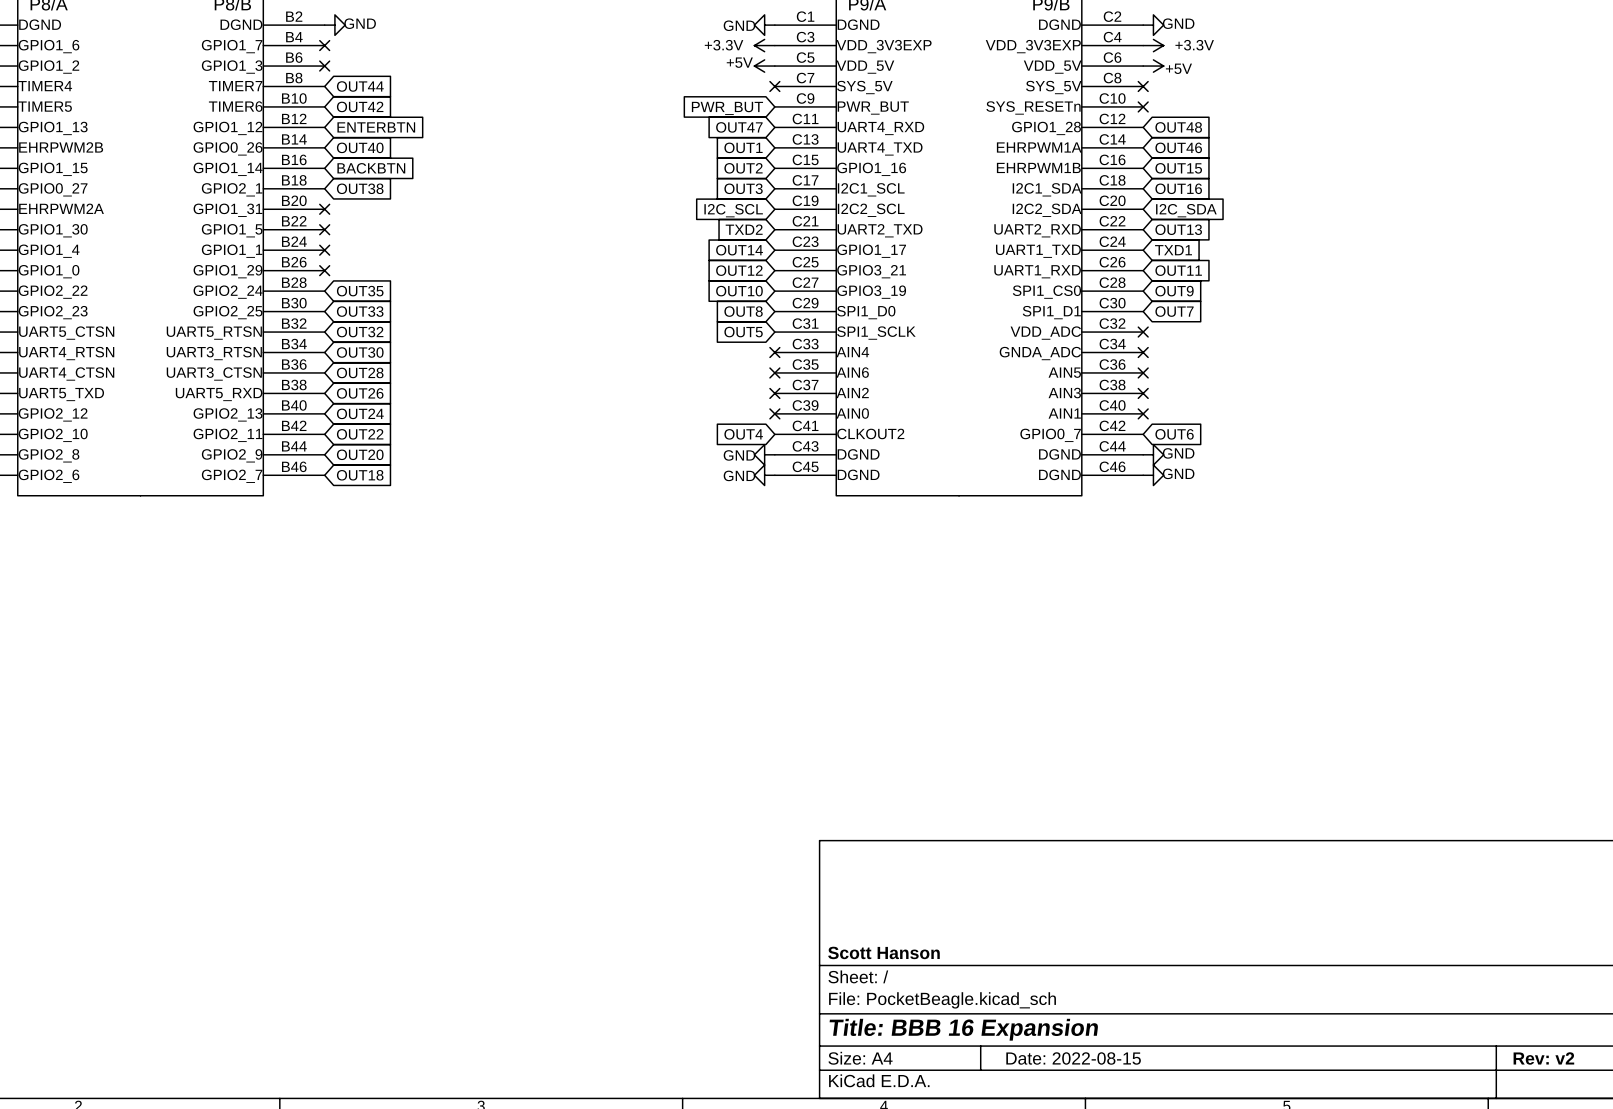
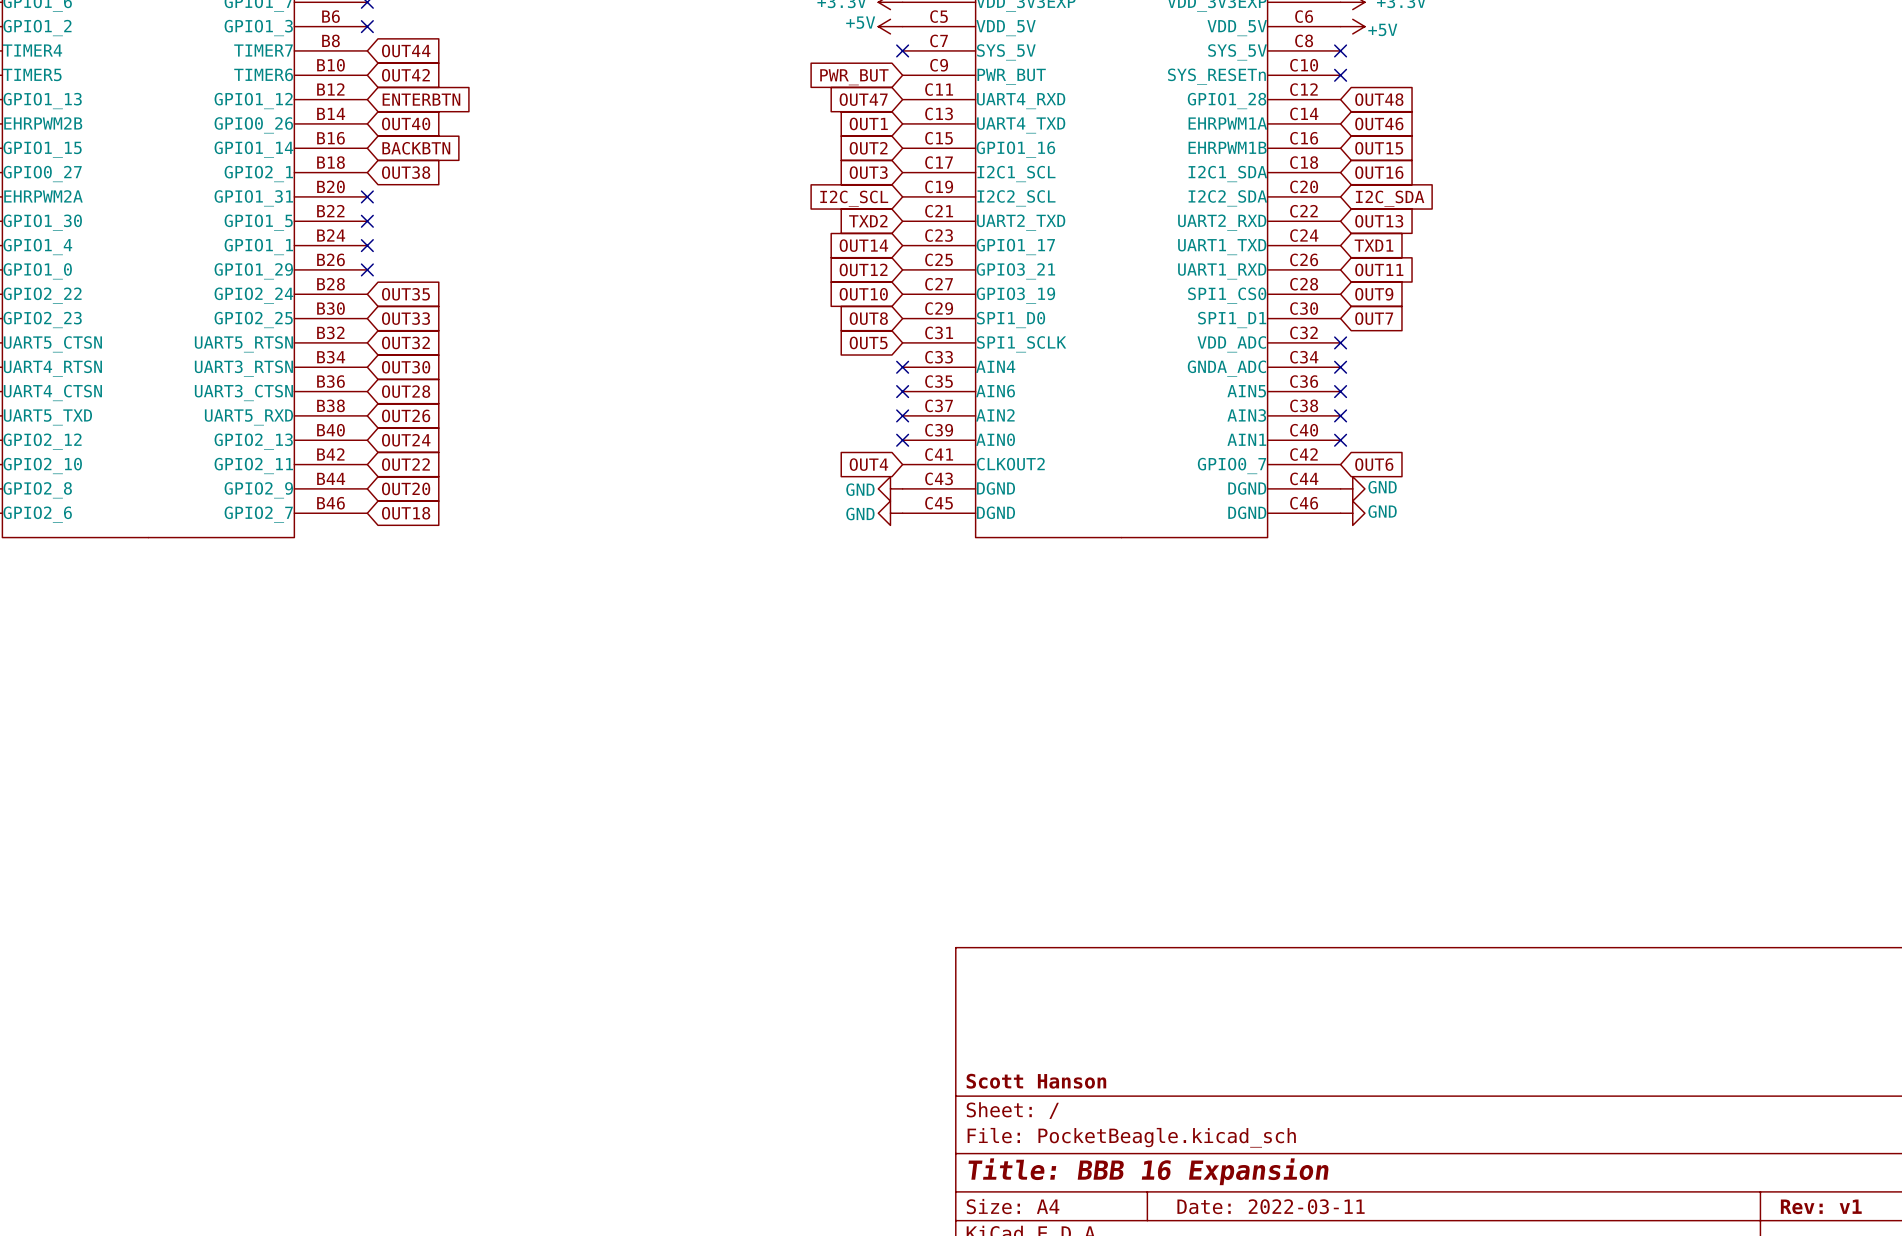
title block: Date: 2022-08-15 (1073, 1058) -> Date: 2022-03-11 (1271, 1206)
title block: Rev: v2 (1543, 1058) -> Rev: v1 (1821, 1206)

